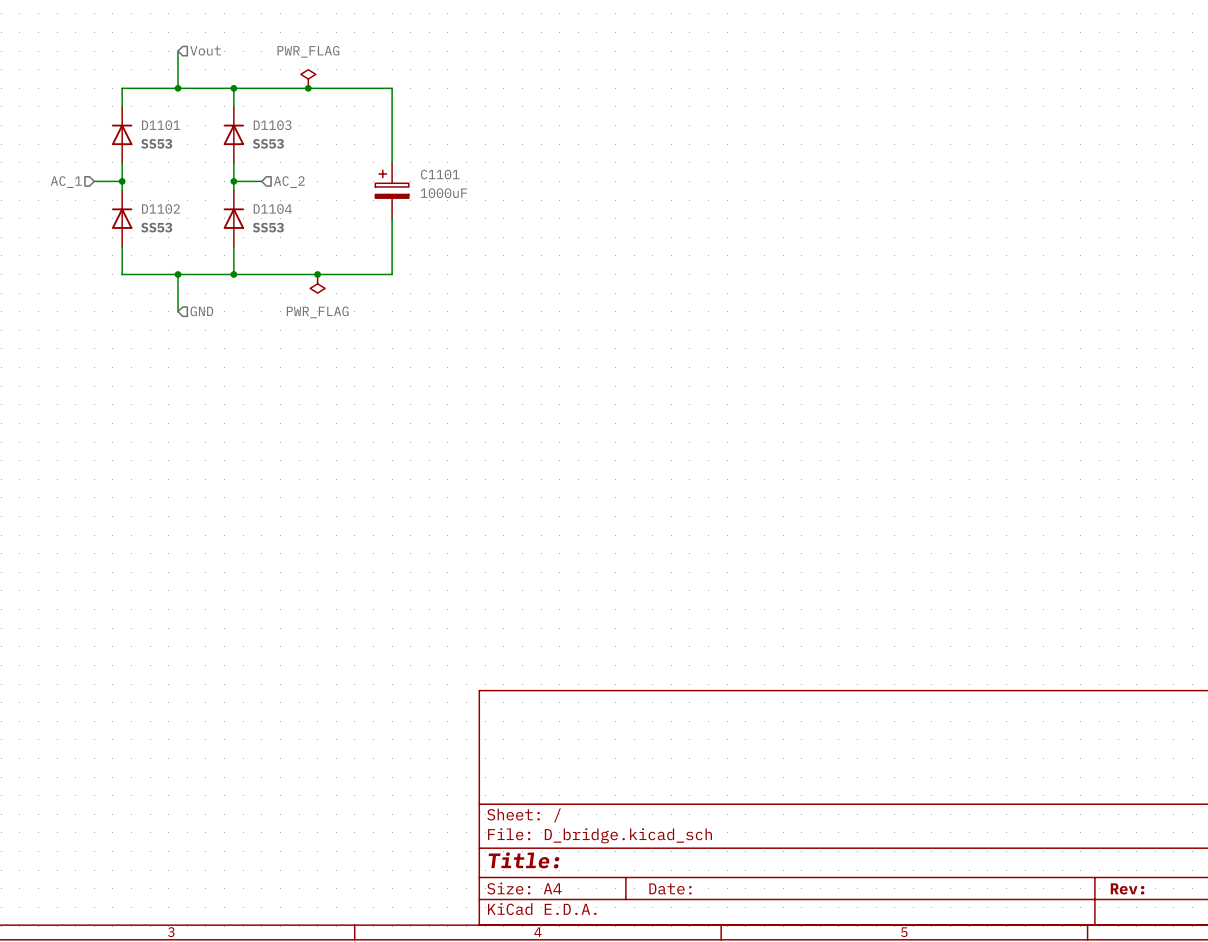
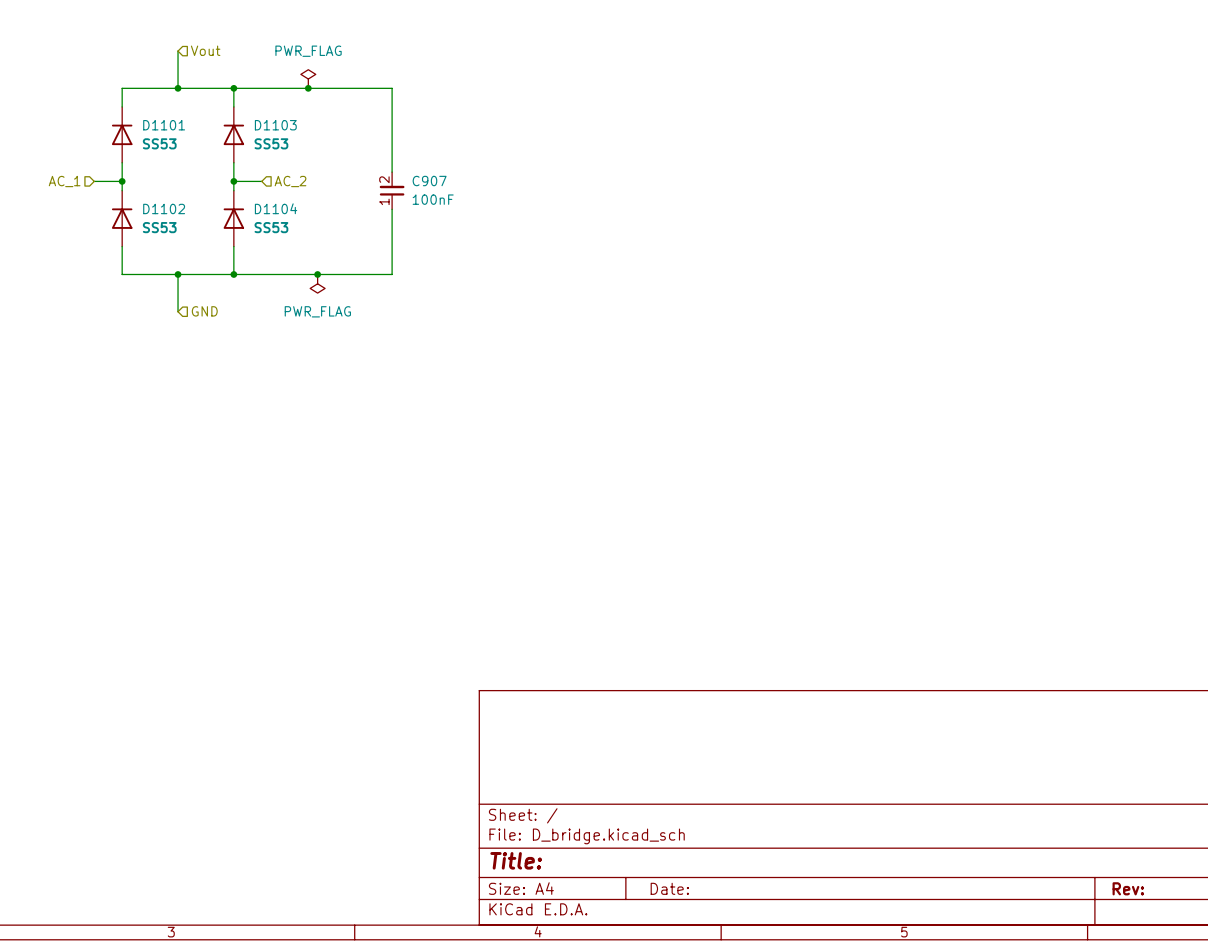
C1101: 1000uF (392, 190) -> none
C907: none -> 100nF (392, 190)

